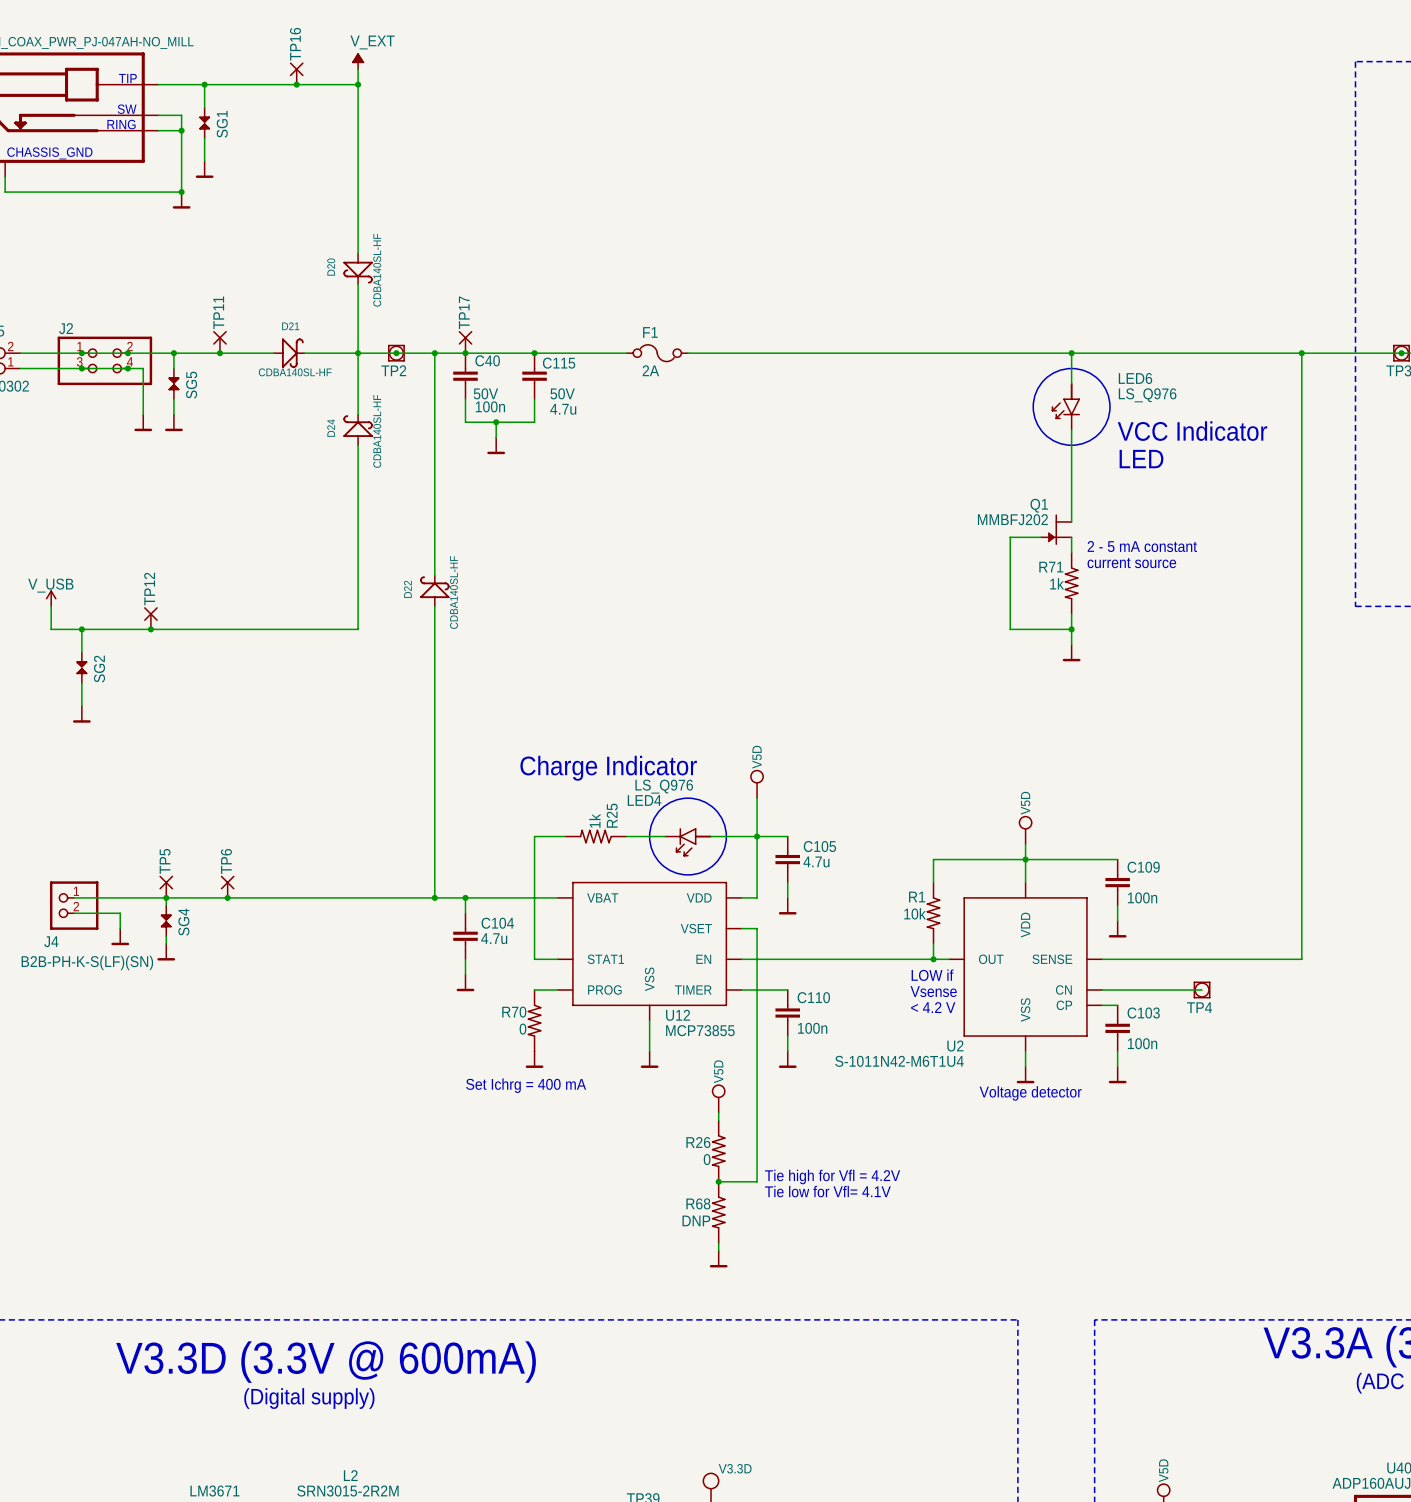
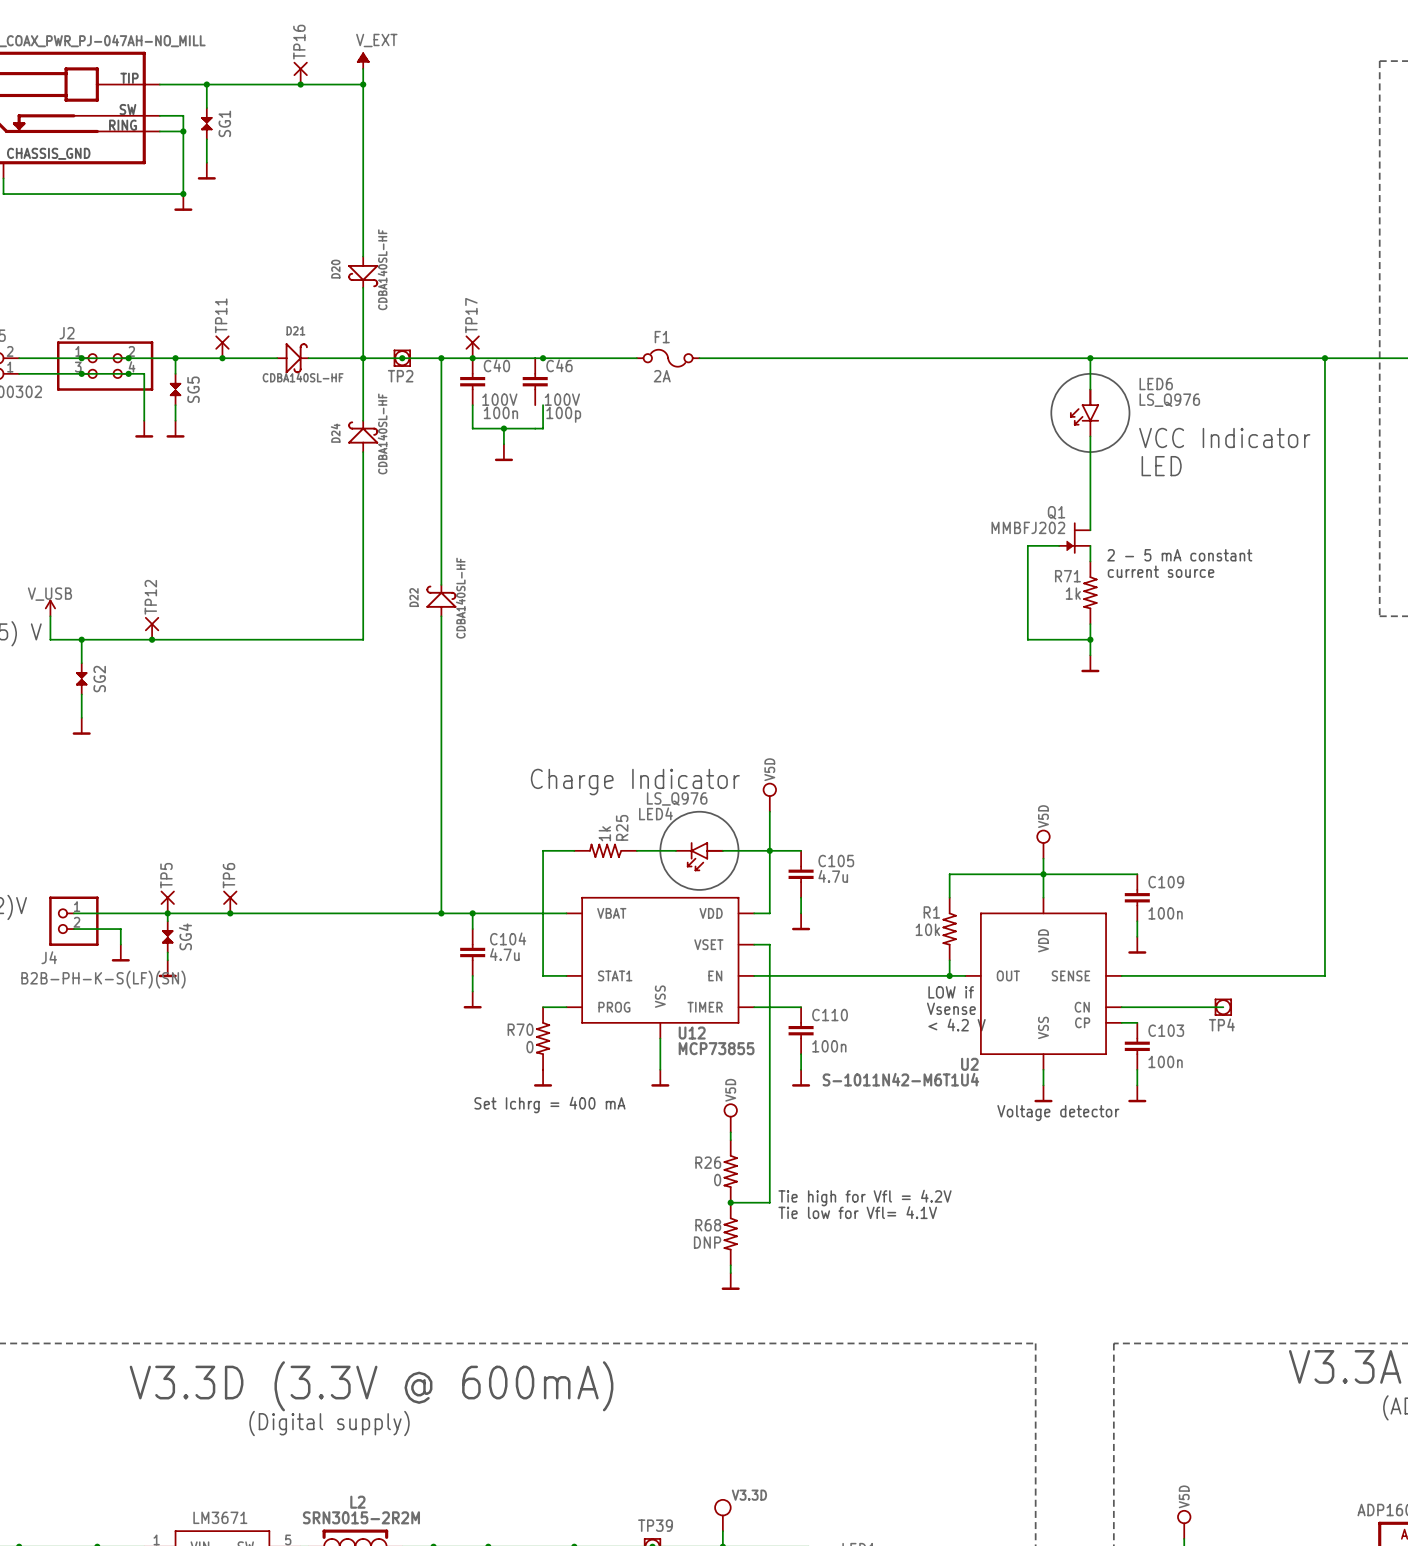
C46: none -> 100p (535, 381)
C115: 4.7u (534, 376) -> none
C40 text: 50V (485, 393) -> 100V (499, 399)

